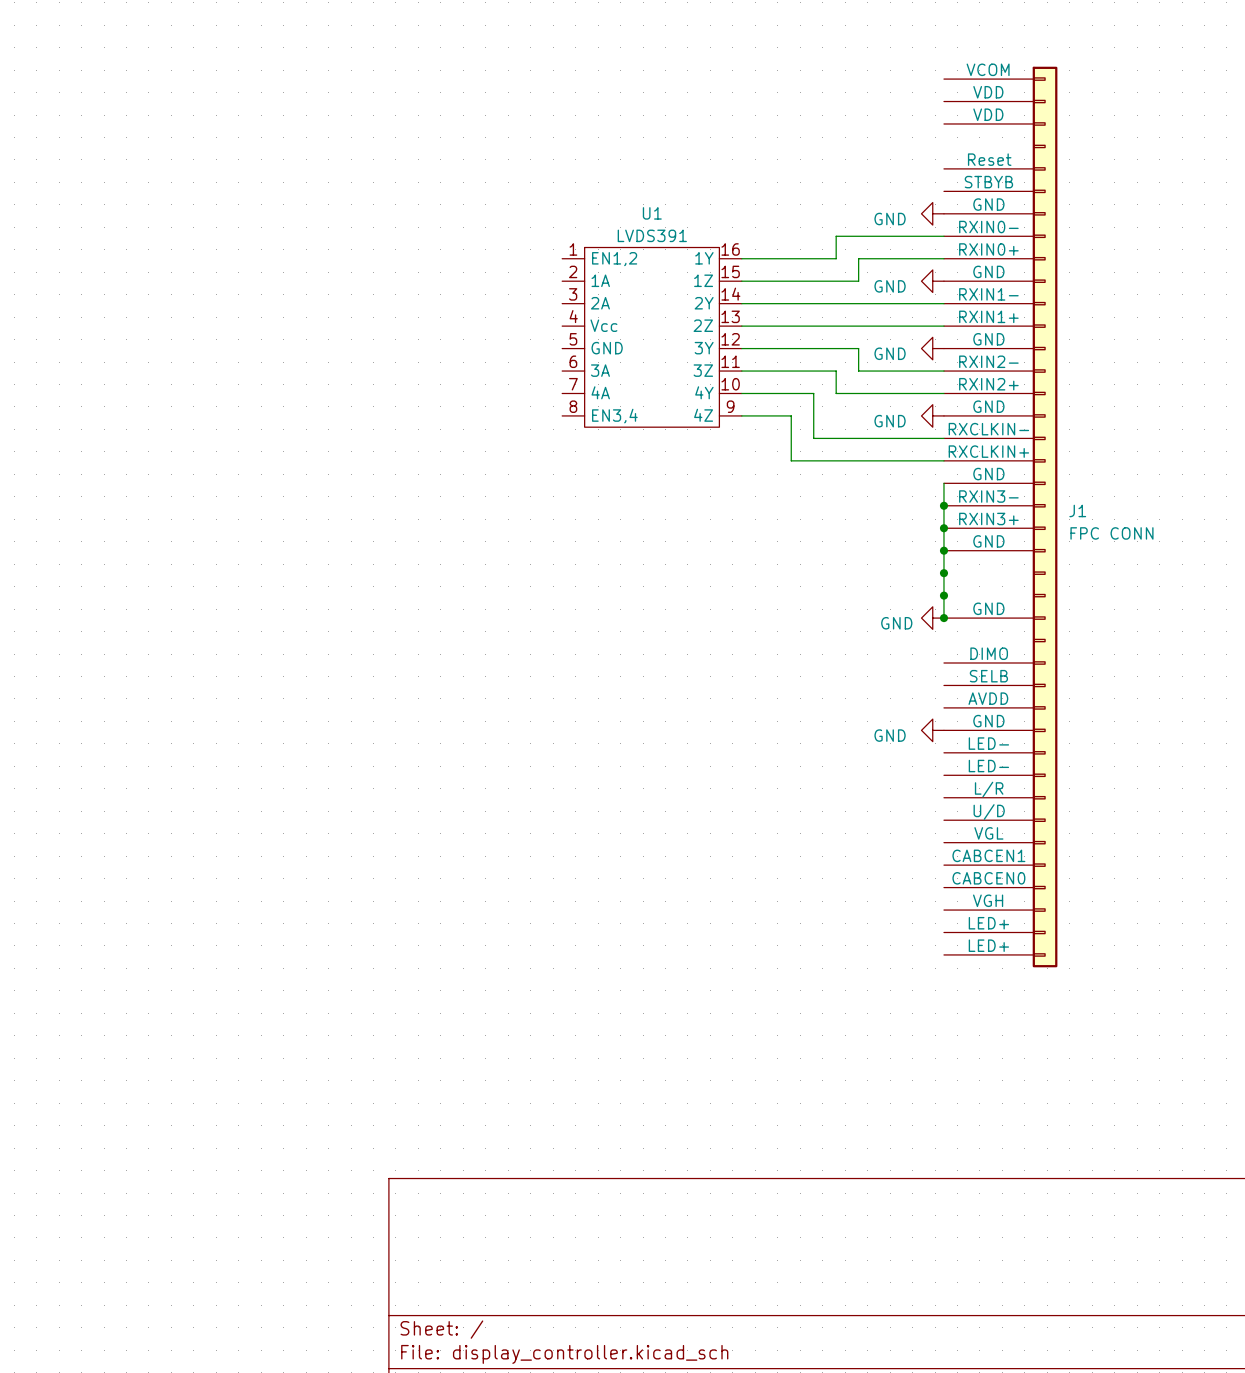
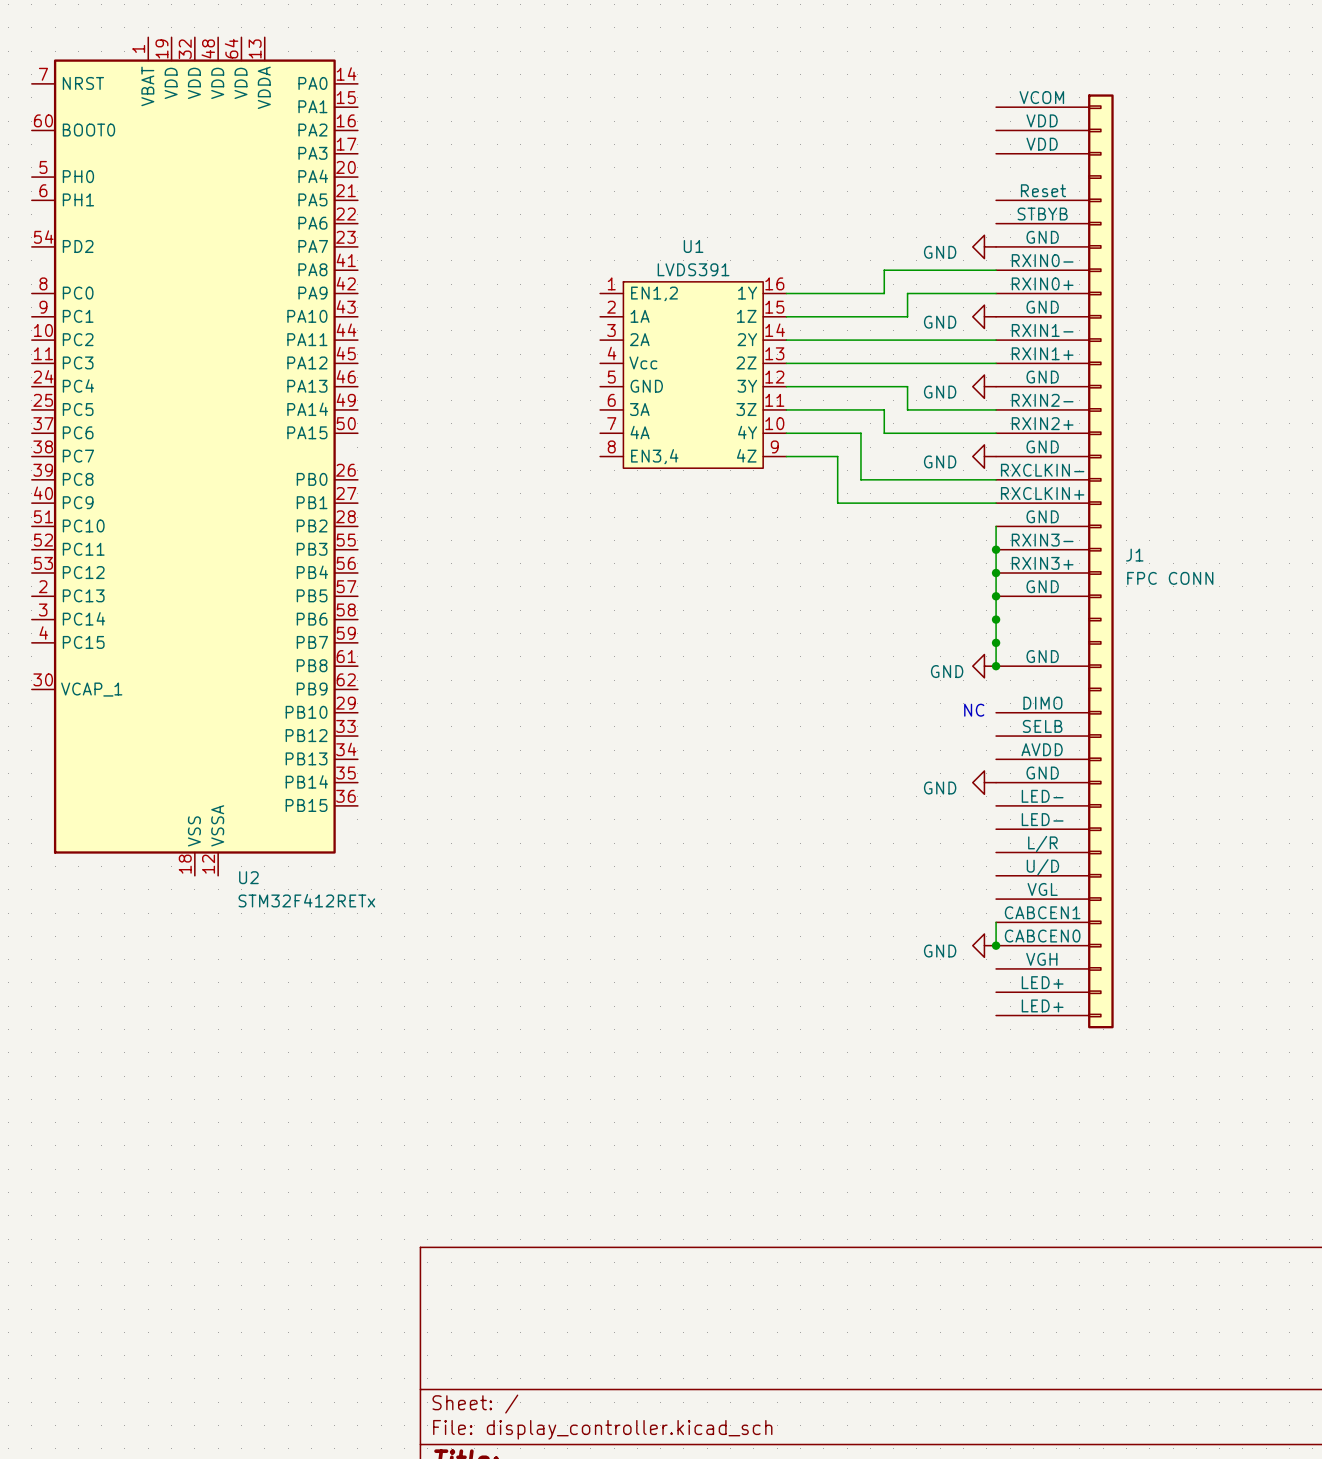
U1 symbol: [562, 247, 742, 428] -> [600, 281, 787, 469]
U2: none -> STM32F412RETx (194, 456)
text: none -> NC (974, 710)
wire: none -> (996, 922) (996, 945)
power symbol: none -> GND (984, 945)
junction: none -> (996, 945)

